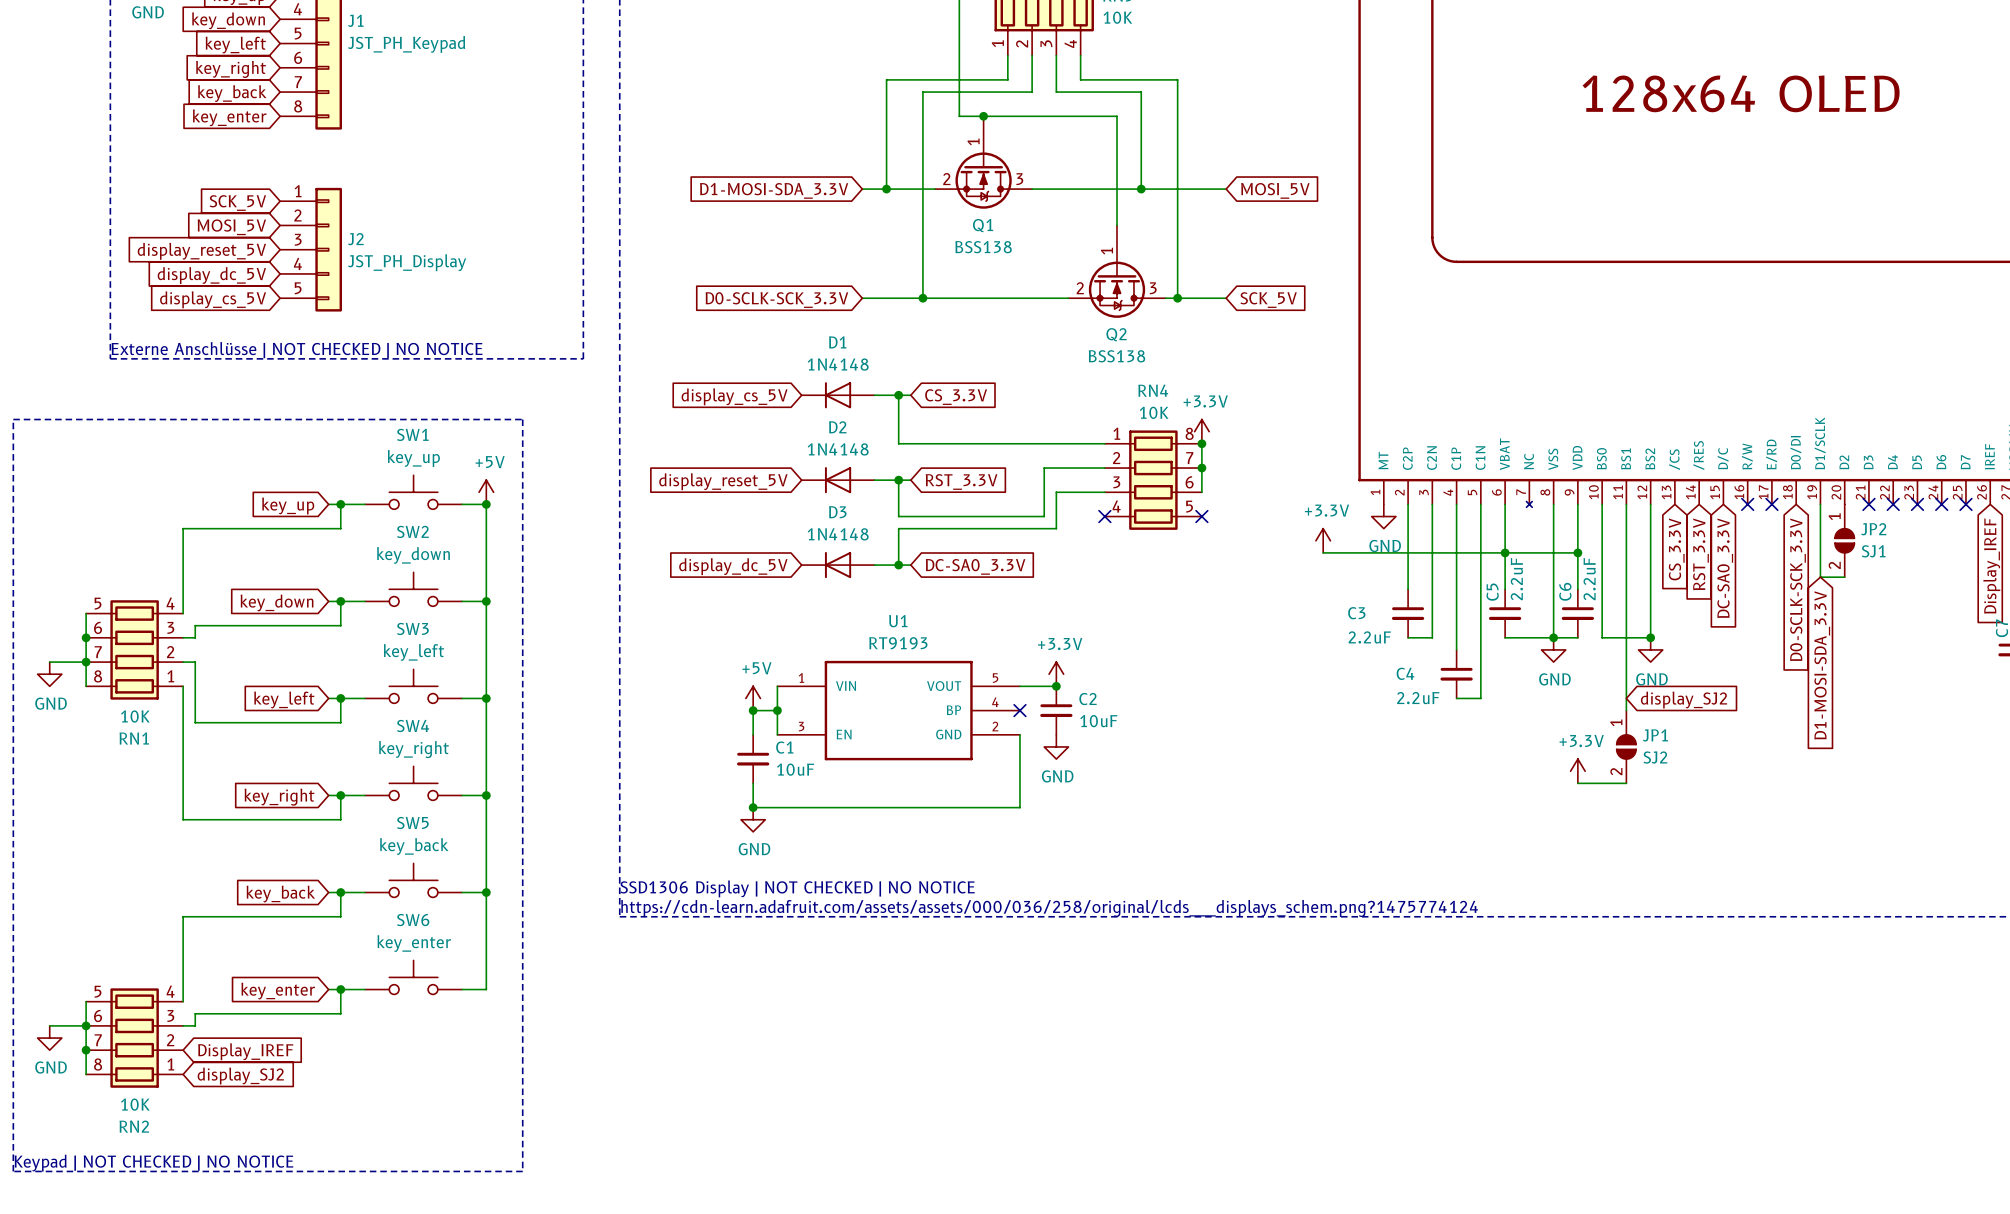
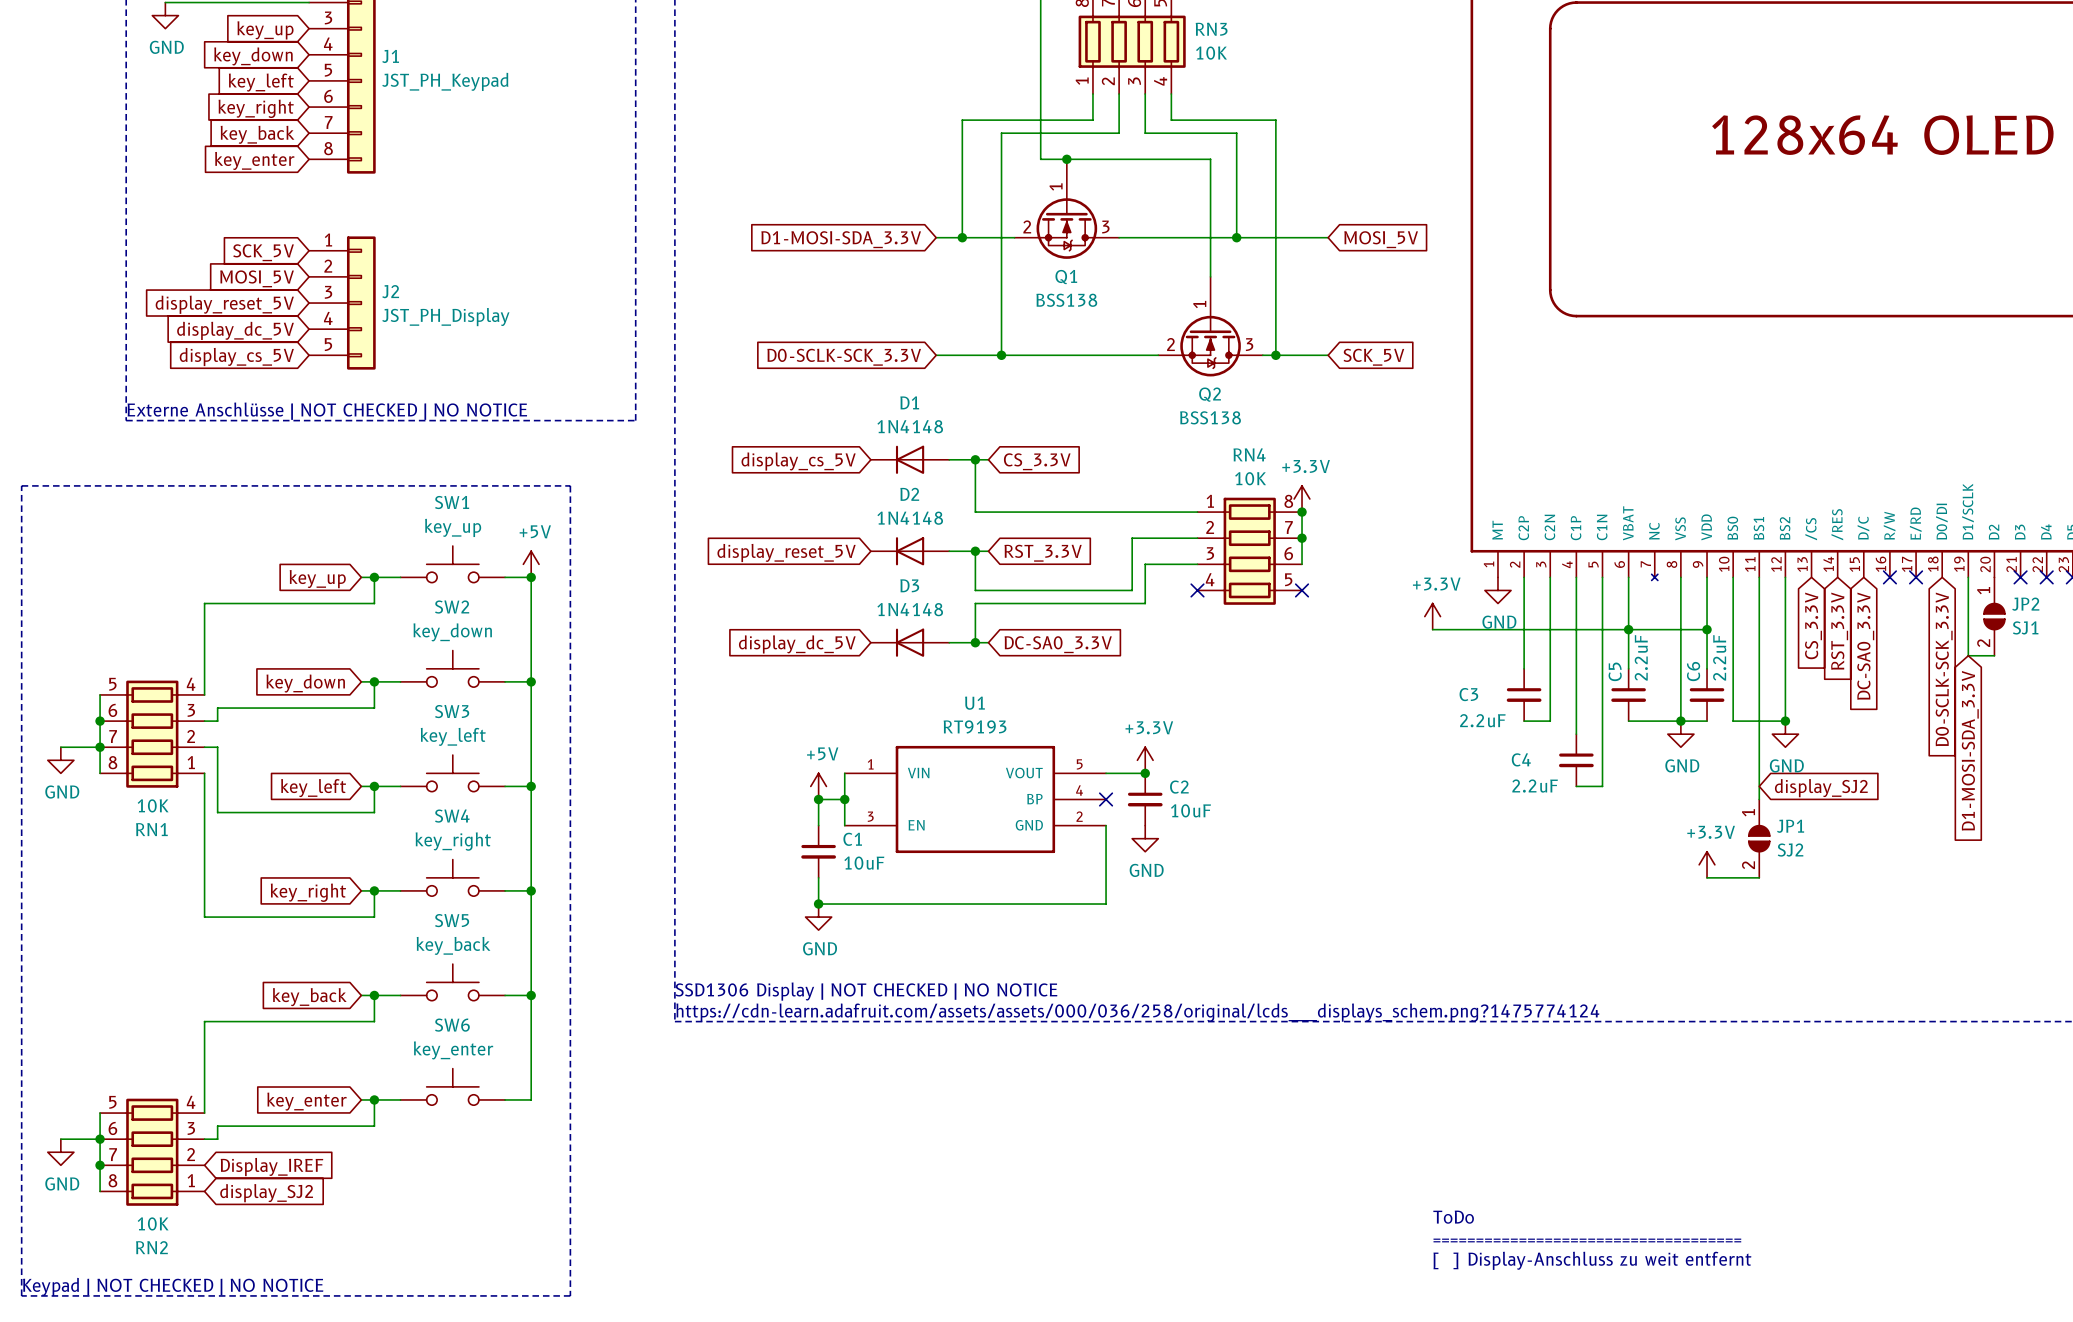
text: none -> ToDo (1453, 1217)
text: none -> ==================================== (1587, 1240)
text: none -> [ ] Display-Anschluss zu weit entfernt (1592, 1260)

